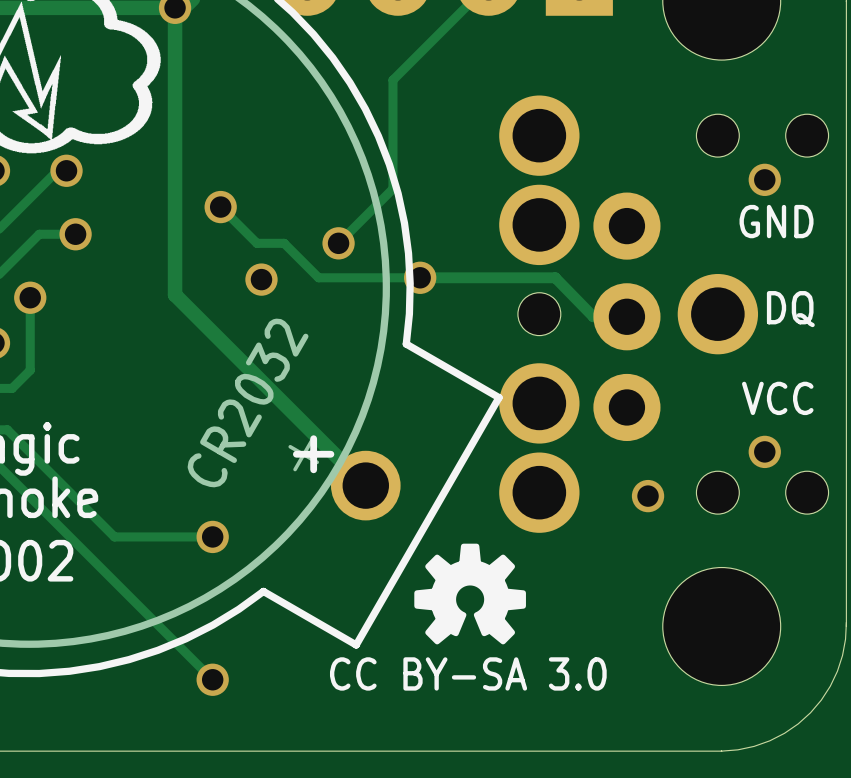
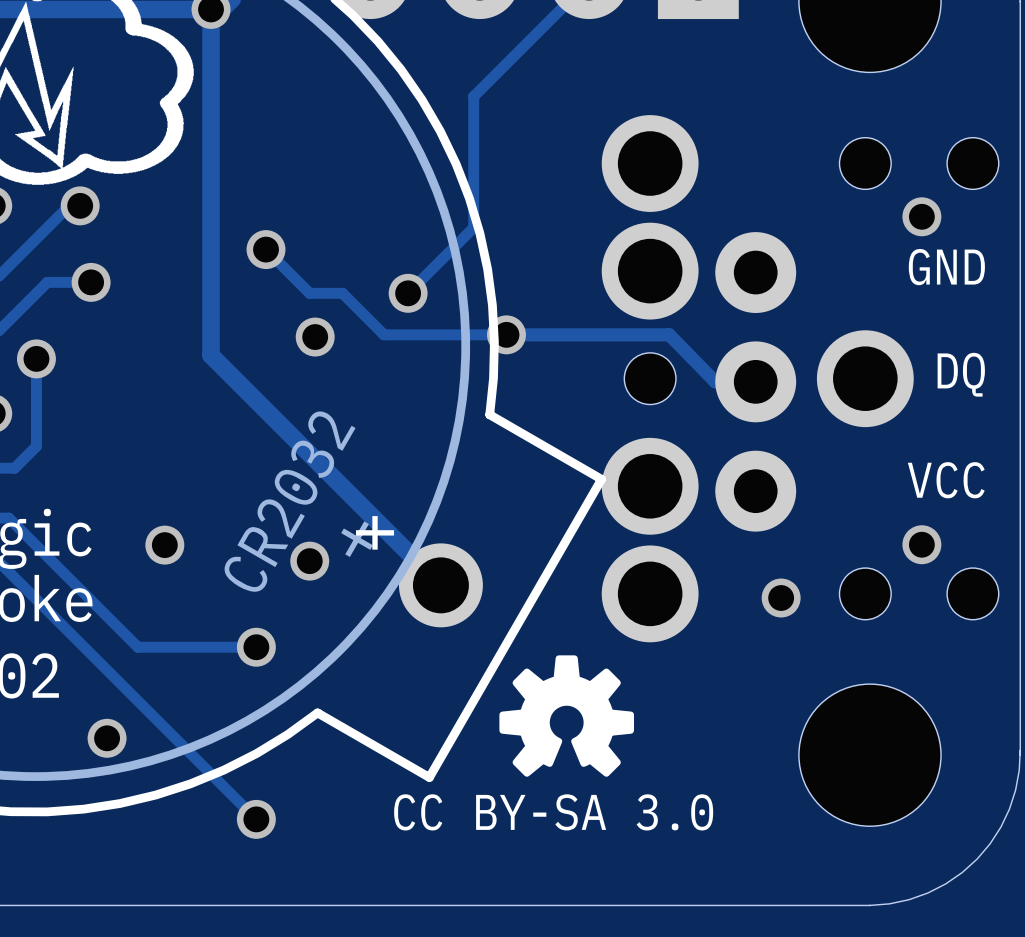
via: none -> (164, 545)
via: none -> (309, 561)
via: none -> (107, 738)

